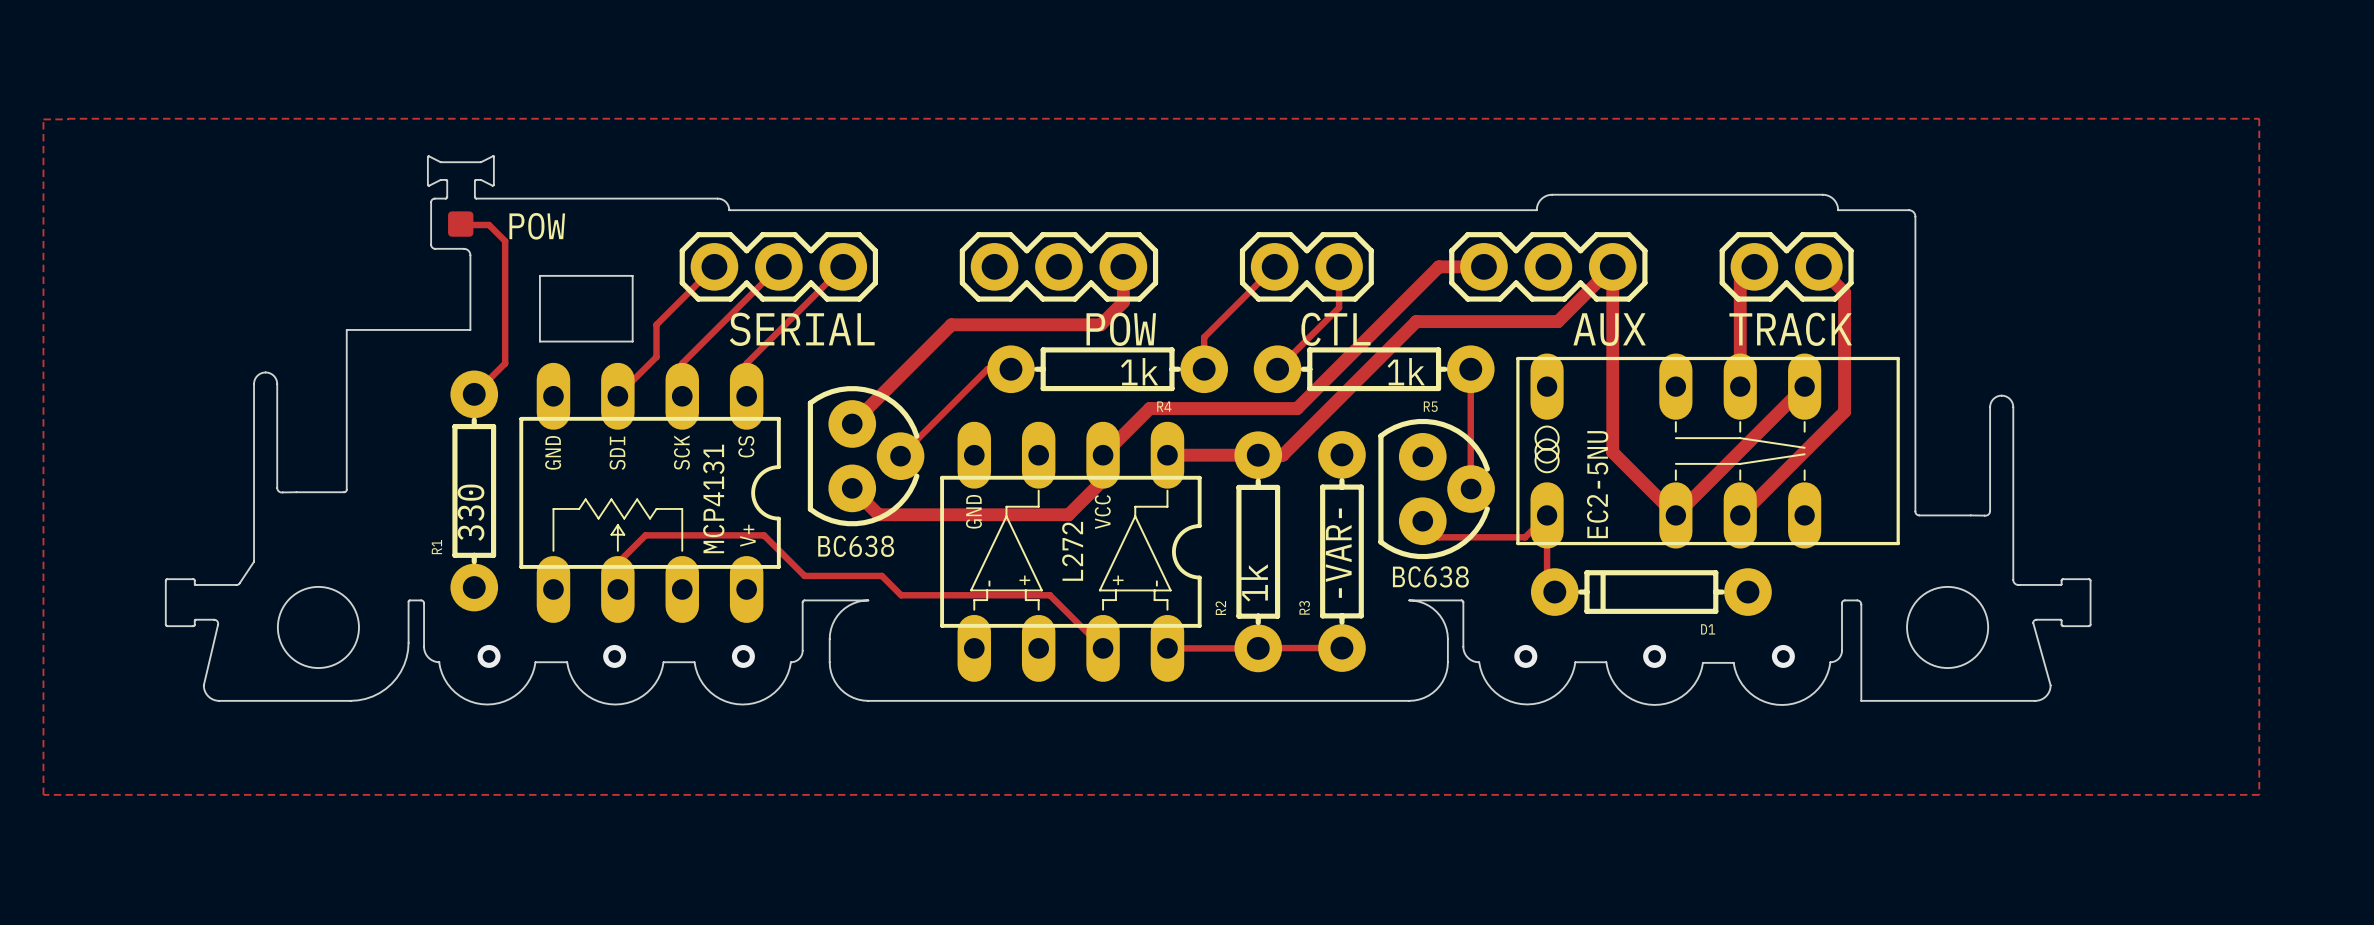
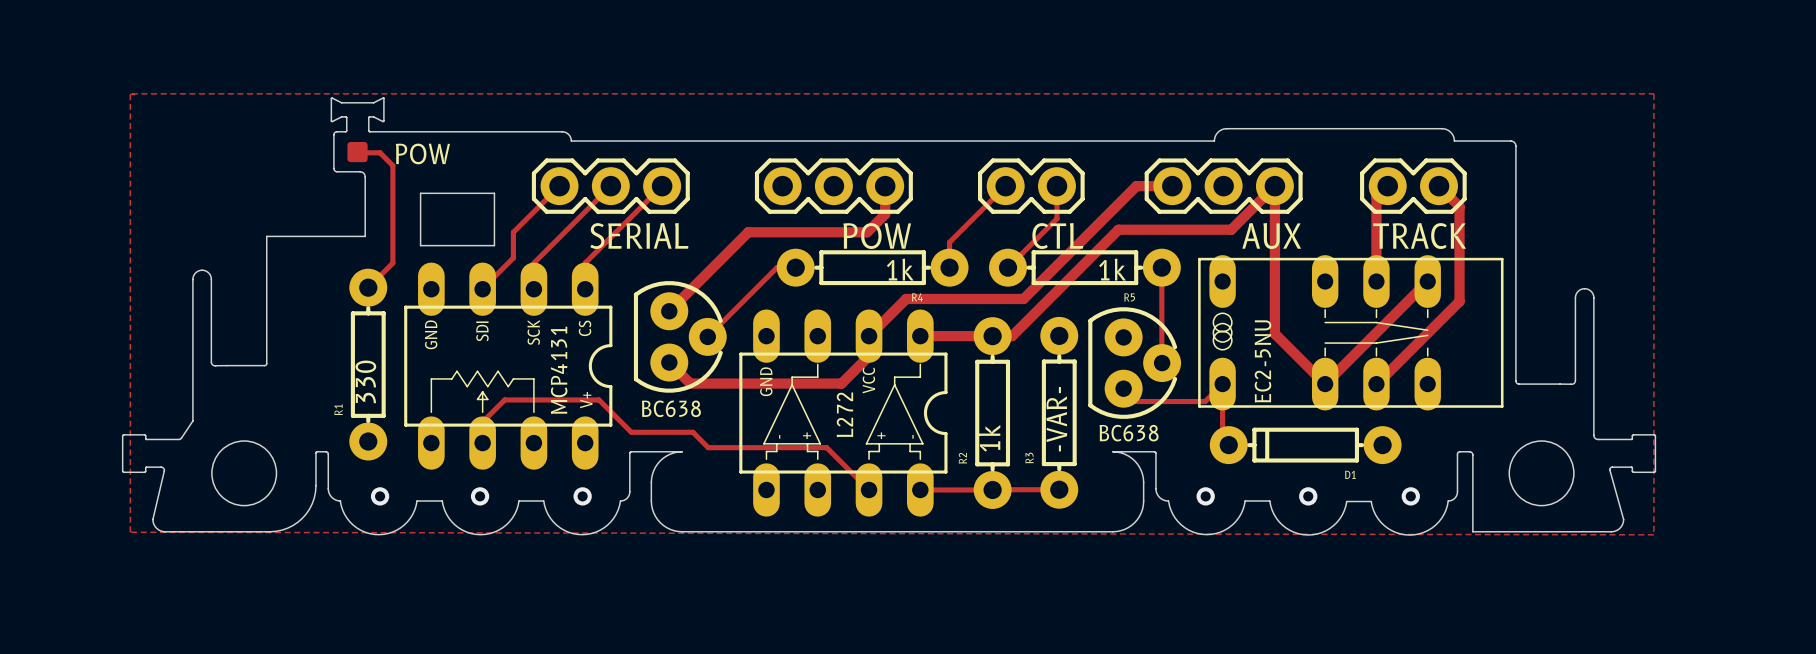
zone outline: (67, 118) (2259, 118) (2259, 794) (43, 794) (43, 119) (67, 118) -> (131, 93) (134, 94) (130, 94) (130, 532) (1653, 534) (1653, 93) (131, 93)

